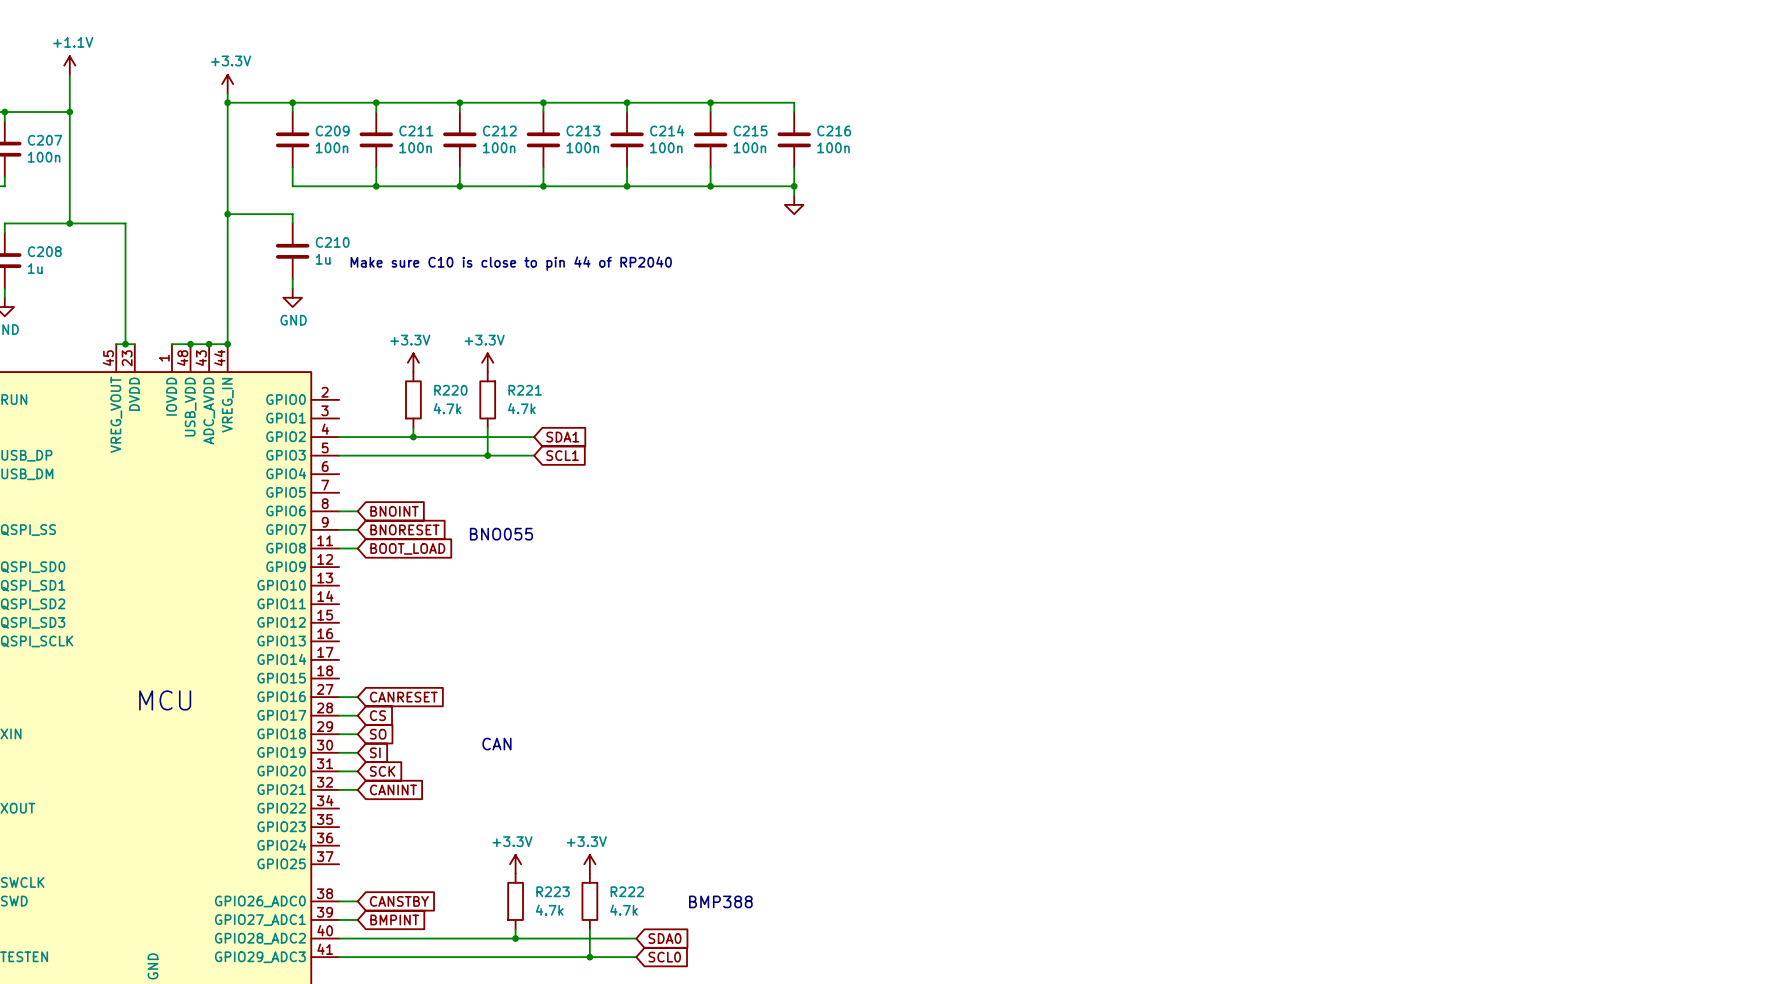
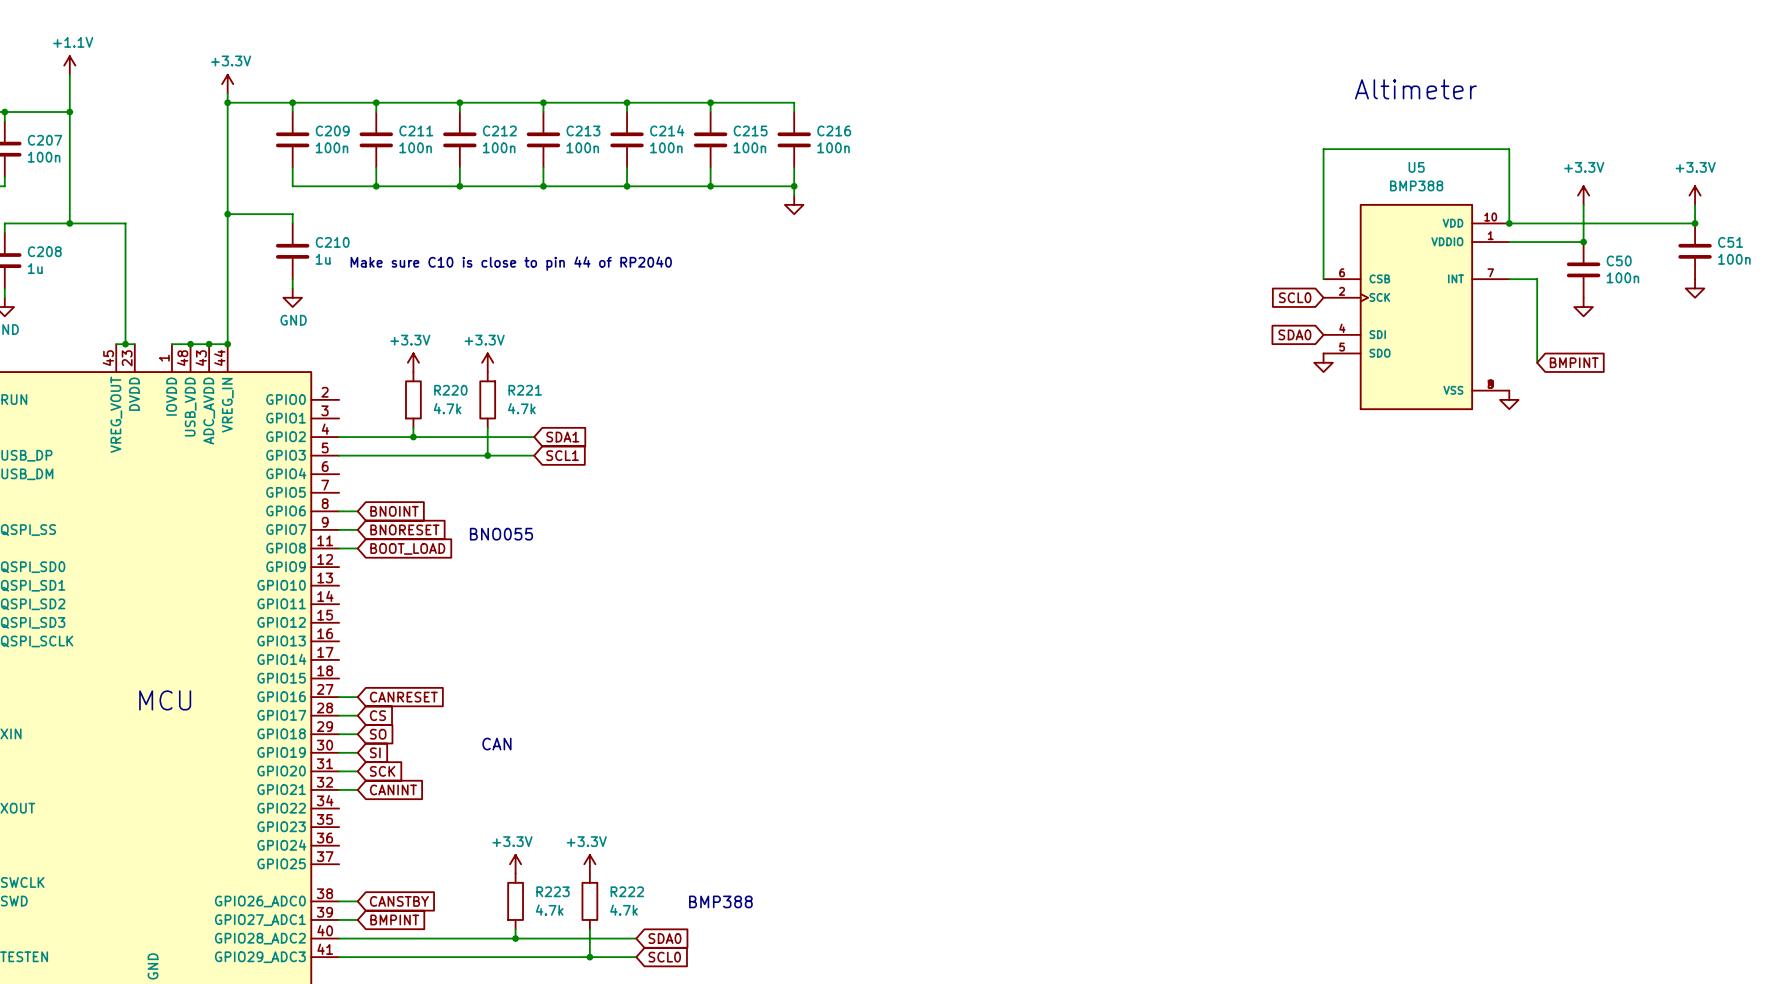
text: none -> Altimeter (1415, 89)
power symbol: none -> +3.3V (1583, 195)
power symbol: none -> +3.3V (1695, 195)
wire: none -> (1583, 204) (1583, 242) (1509, 242)
wire: none -> (1695, 204) (1695, 223) (1509, 223) (1509, 149) (1323, 149) (1323, 279)
junction: none -> (1509, 223)
junction: none -> (1695, 223)
junction: none -> (1583, 242)
C51: none -> 100n (1695, 251)
C50: none -> 100n (1583, 269)
wire: none -> (1509, 279) (1537, 279) (1537, 362)
power symbol: none -> (1695, 288)
global label: none -> SCL0 (1295, 297)
U5: none -> BMP388 (1416, 307)
power symbol: none -> (1583, 307)
global label: none -> SDA0 (1294, 334)
power symbol: none -> (1323, 362)
global label: none -> BMPINT (1574, 362)
power symbol: none -> (1509, 399)

